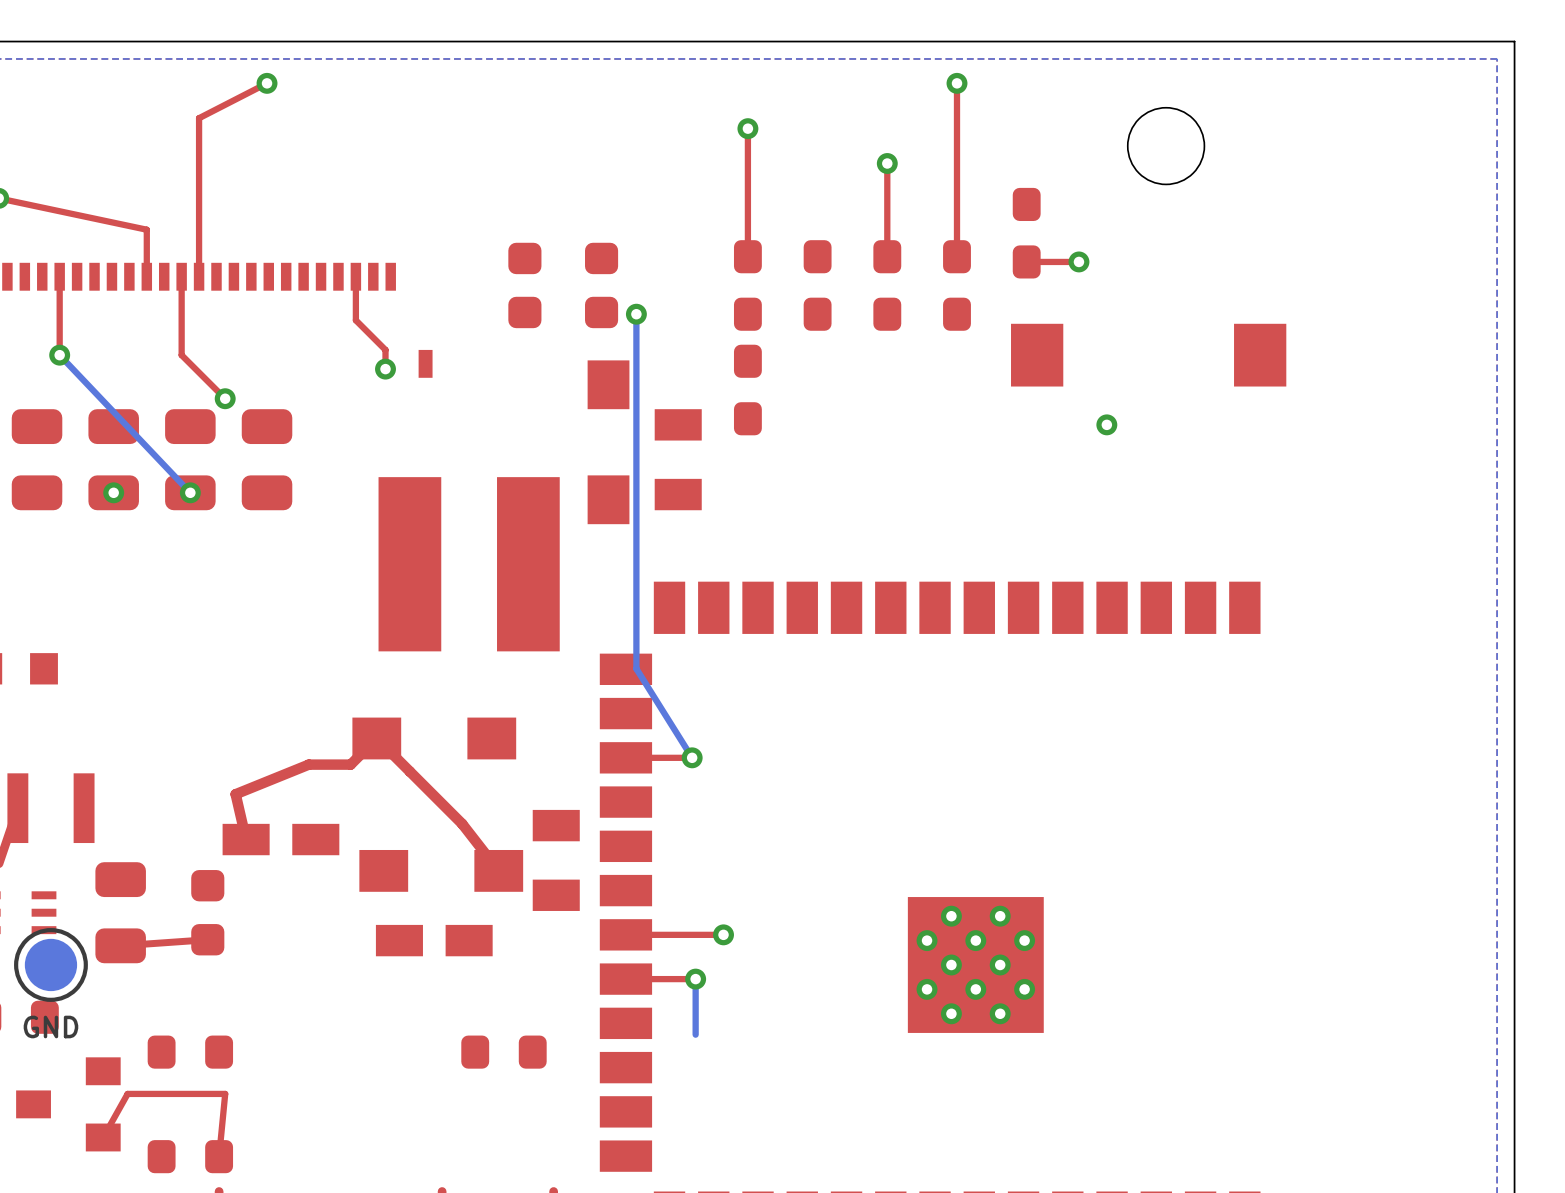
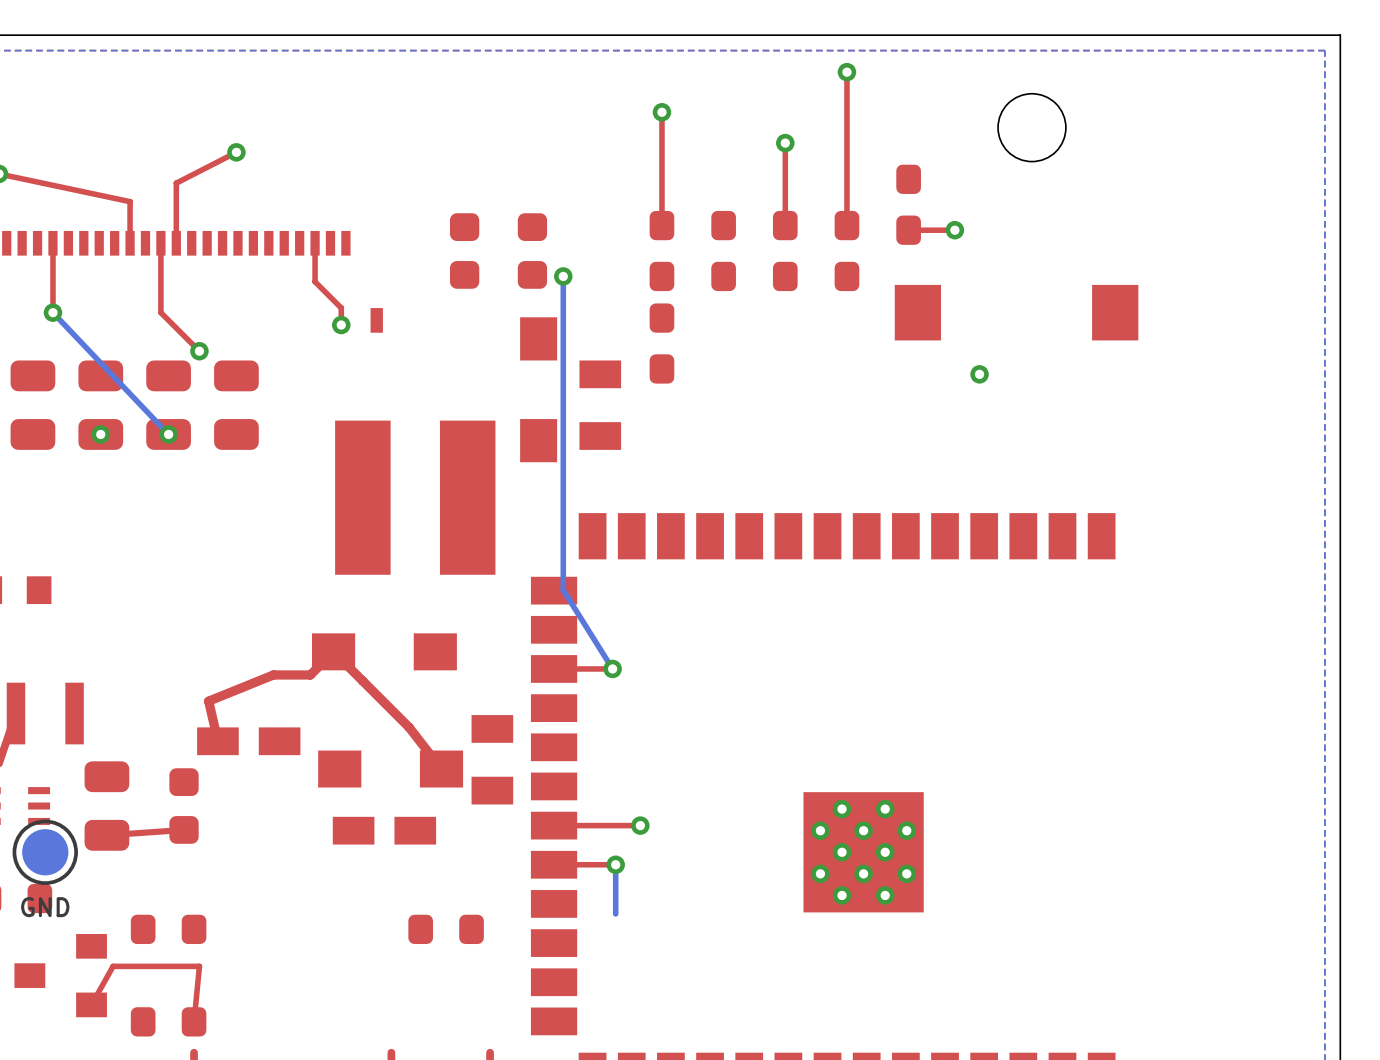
top track: (267, 83) (199, 118) (199, 208) -> (236, 152) (176, 183)
via position: (267, 83) -> (236, 152)

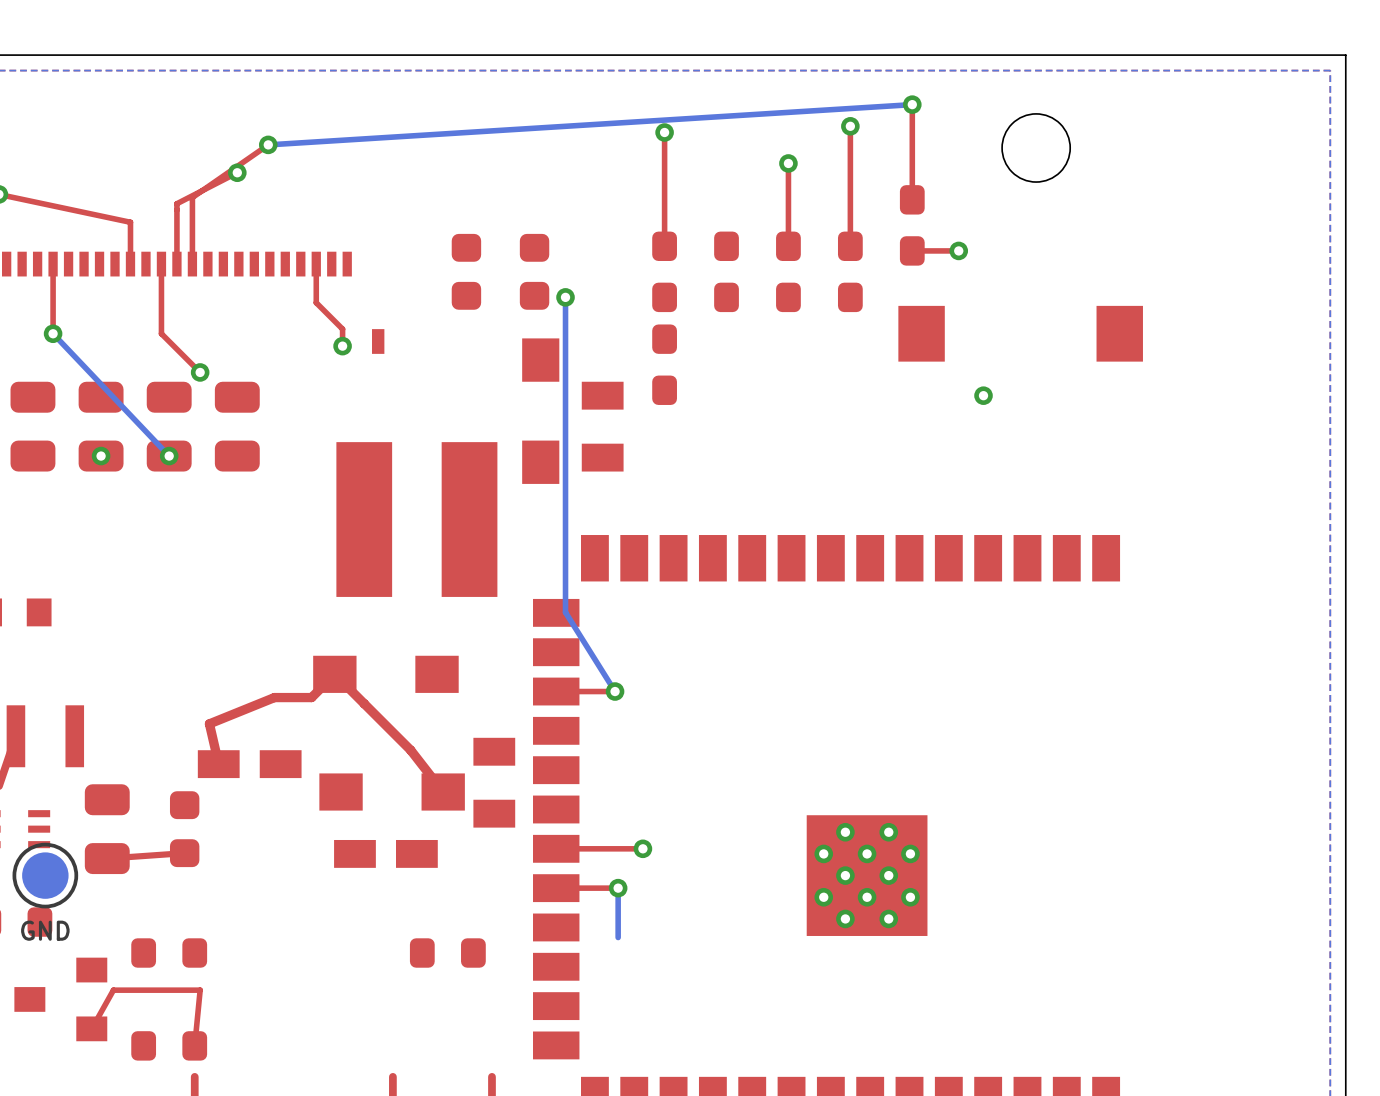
top track: (846, 72) (846, 106) -> none
via position: (846, 72) -> (850, 126)
top track: none -> (912, 104) (912, 199)
bottom track: none -> (912, 104) (268, 144)
via: none -> (912, 104)
top track: none -> (268, 144) (192, 197) (192, 264)
via: none -> (268, 144)

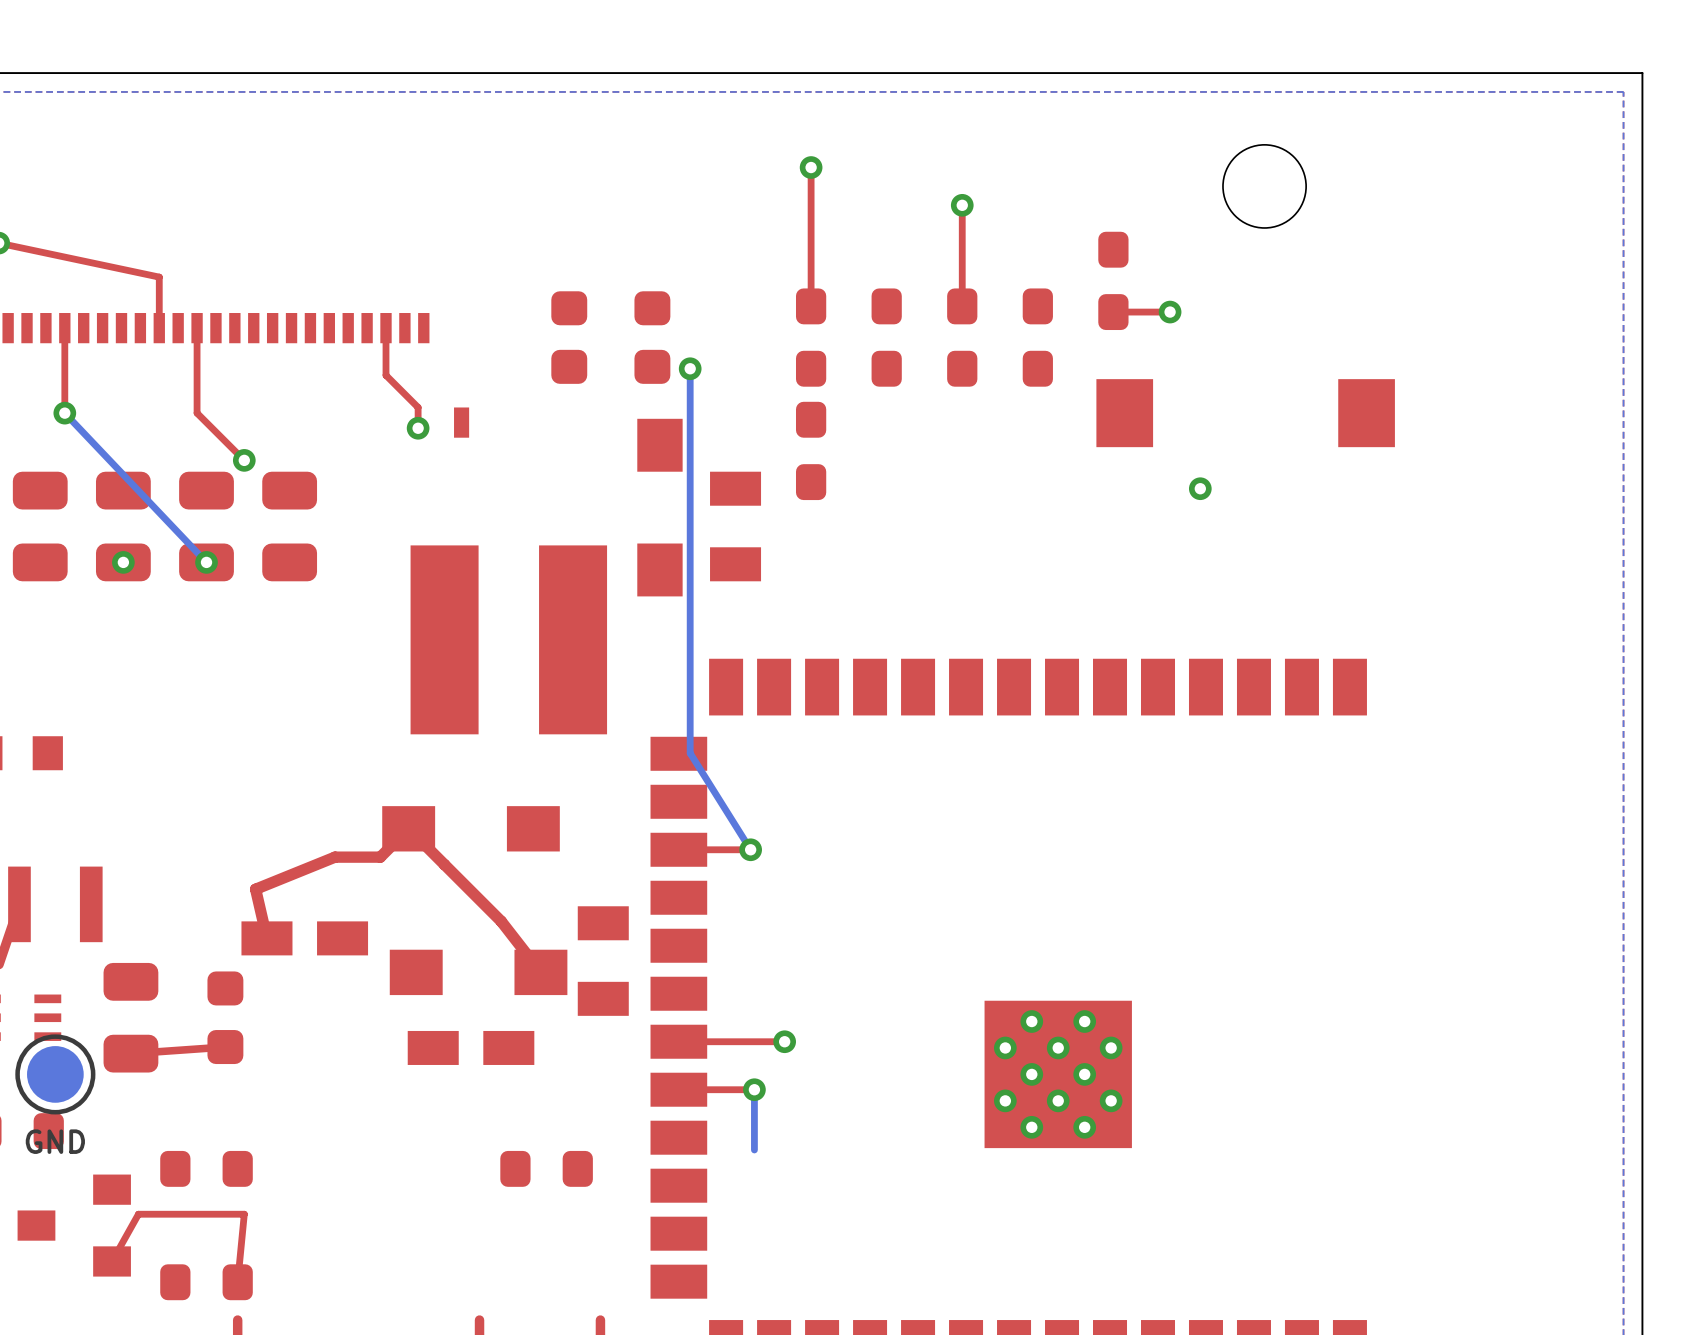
top track: (912, 104) (912, 199) -> none
bottom track: (912, 104) (268, 144) -> none
via: (912, 104) -> none
top track: (850, 126) (850, 246) -> none
via: (850, 126) -> none
top track: (268, 144) (192, 197) (192, 264) -> none
via: (268, 144) -> none
top track: (237, 172) (176, 203) (176, 264) -> none
via: (237, 172) -> none

